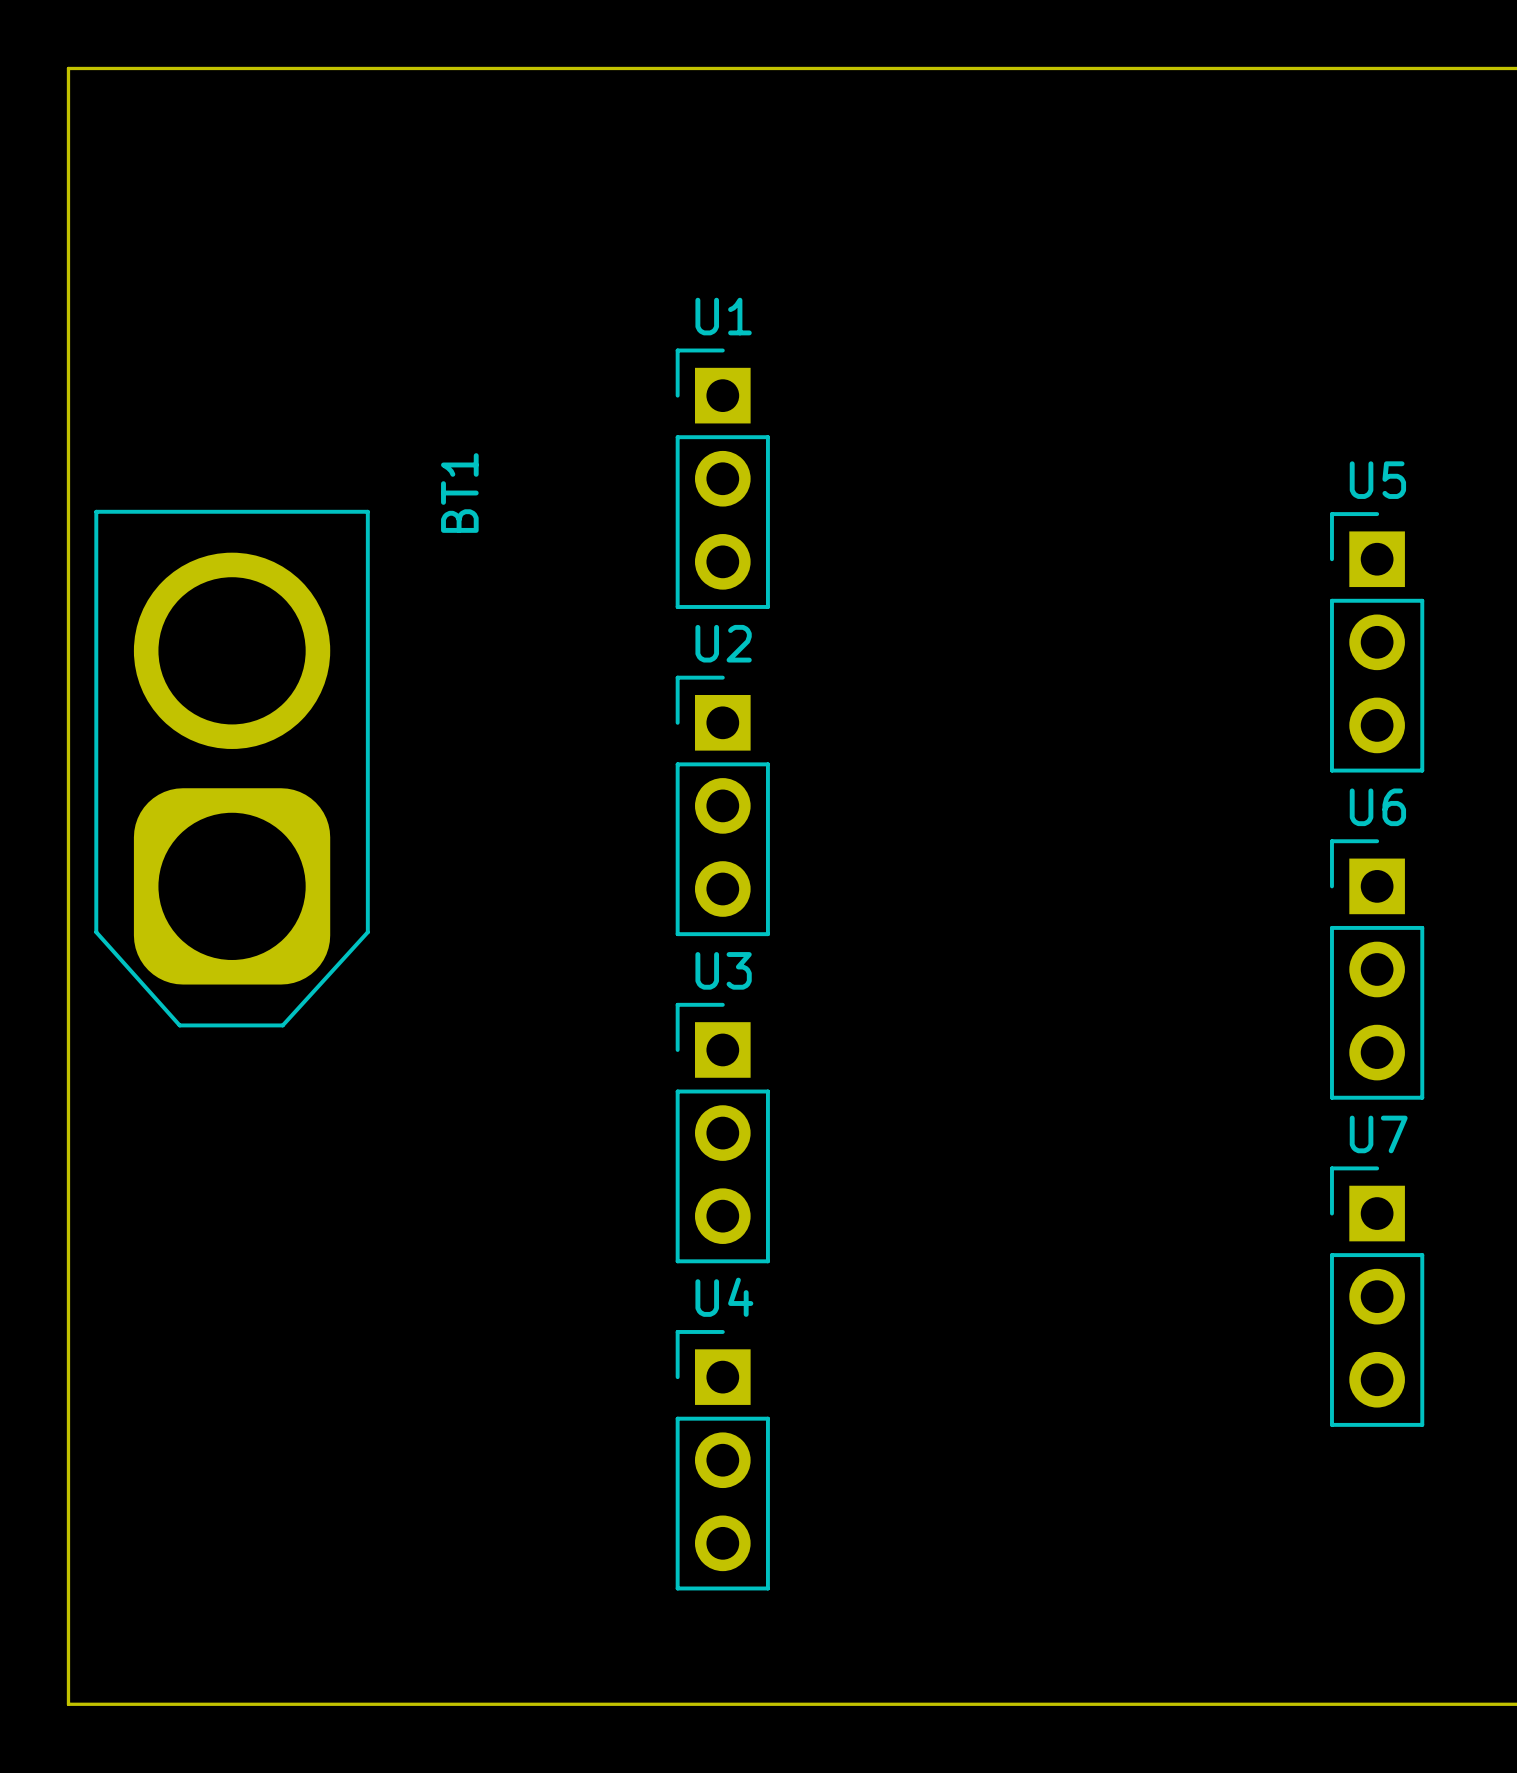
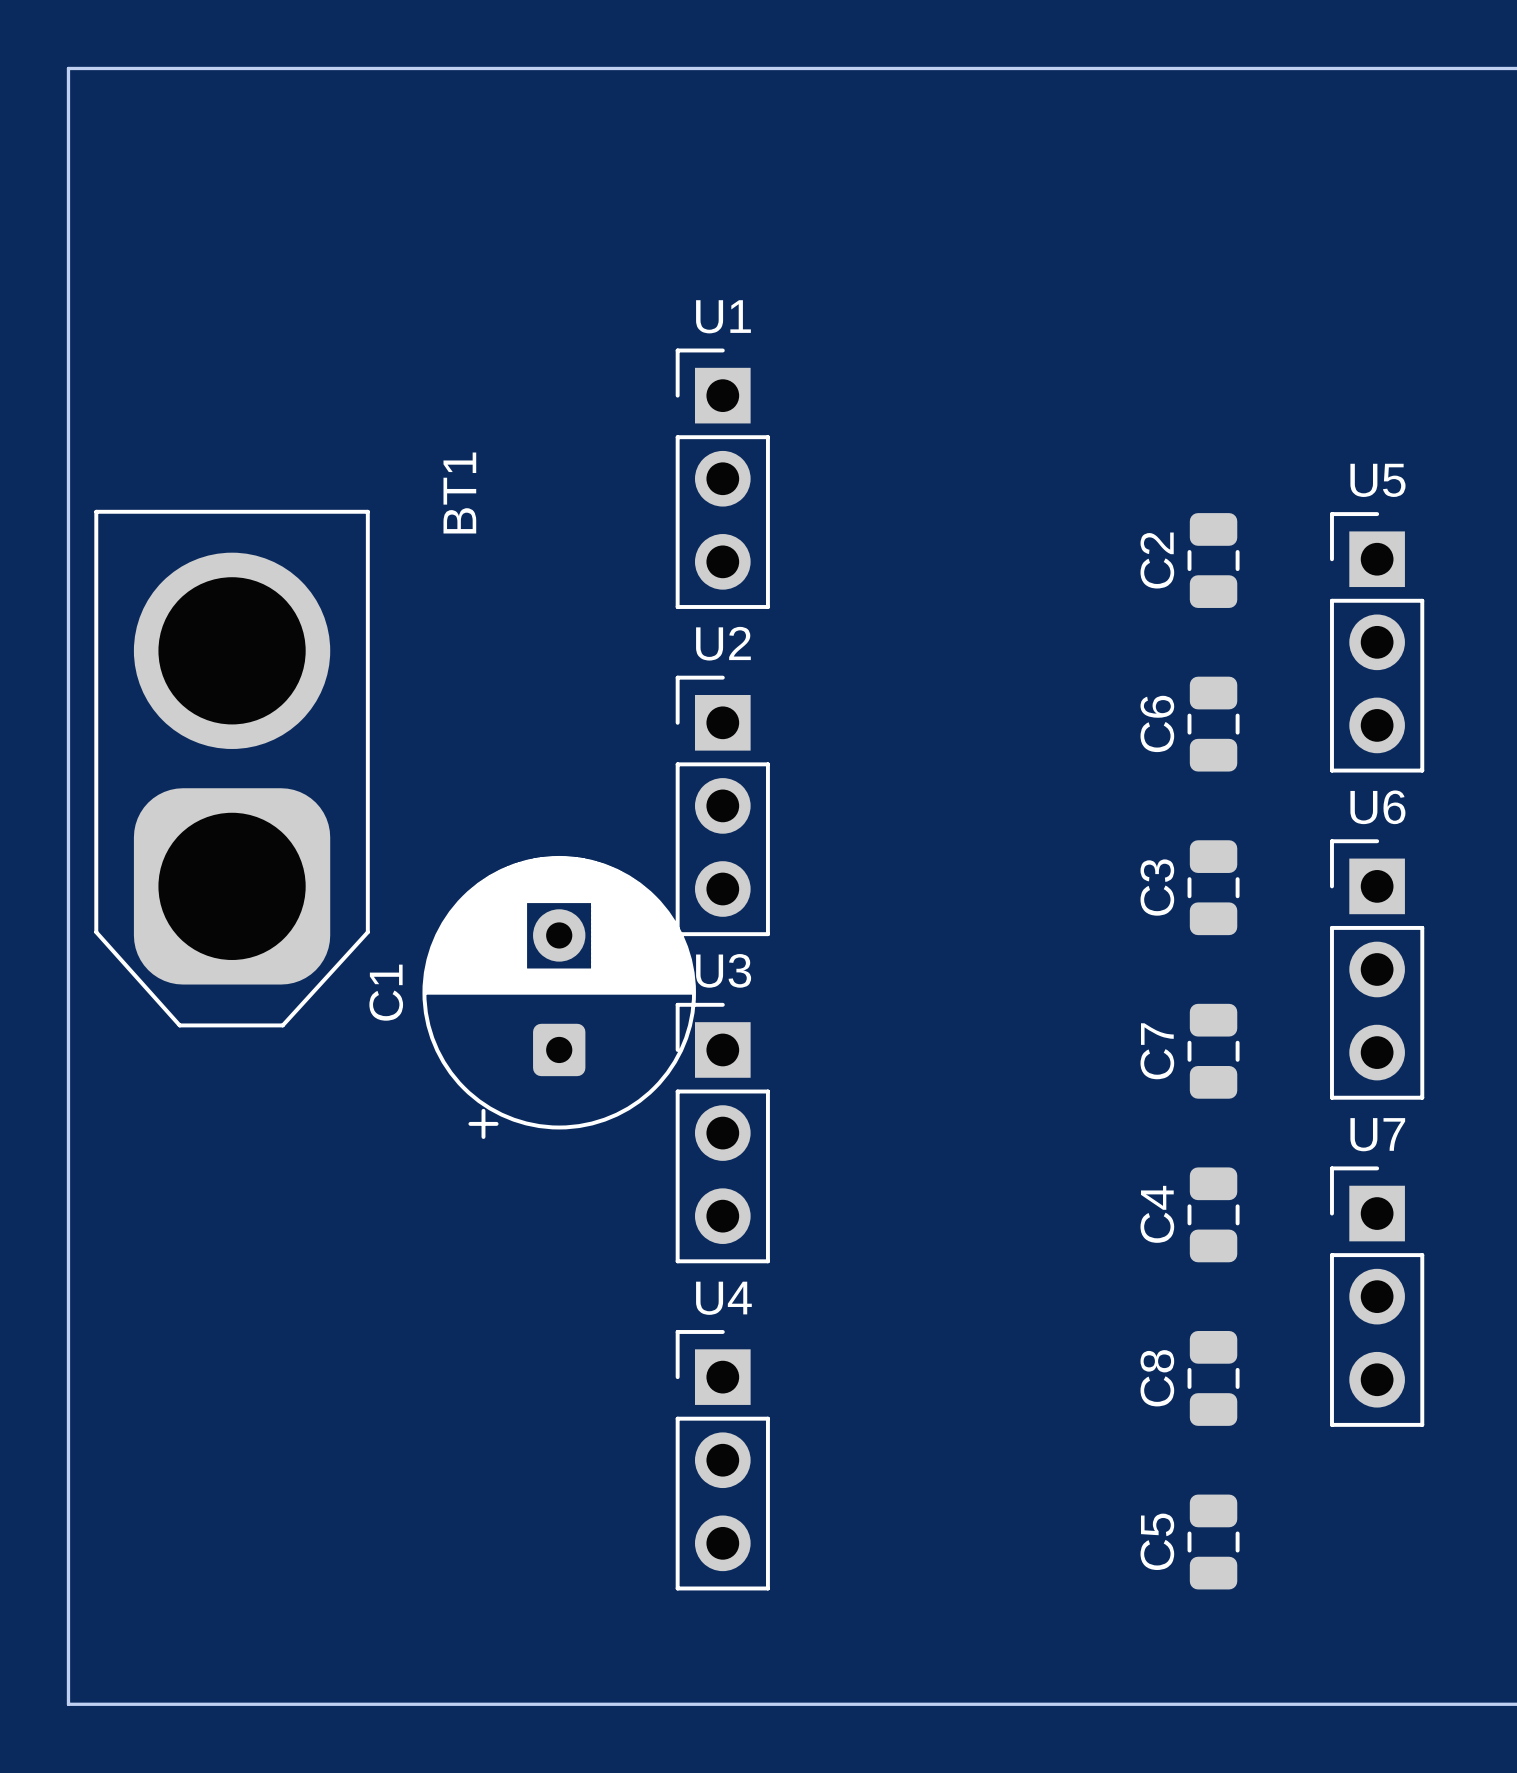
C2: none -> (1213, 560)
C6: none -> (1213, 724)
C3: none -> (1213, 887)
C1: none -> (559, 997)
C7: none -> (1213, 1051)
C4: none -> (1213, 1214)
C8: none -> (1213, 1378)
C5: none -> (1213, 1542)

